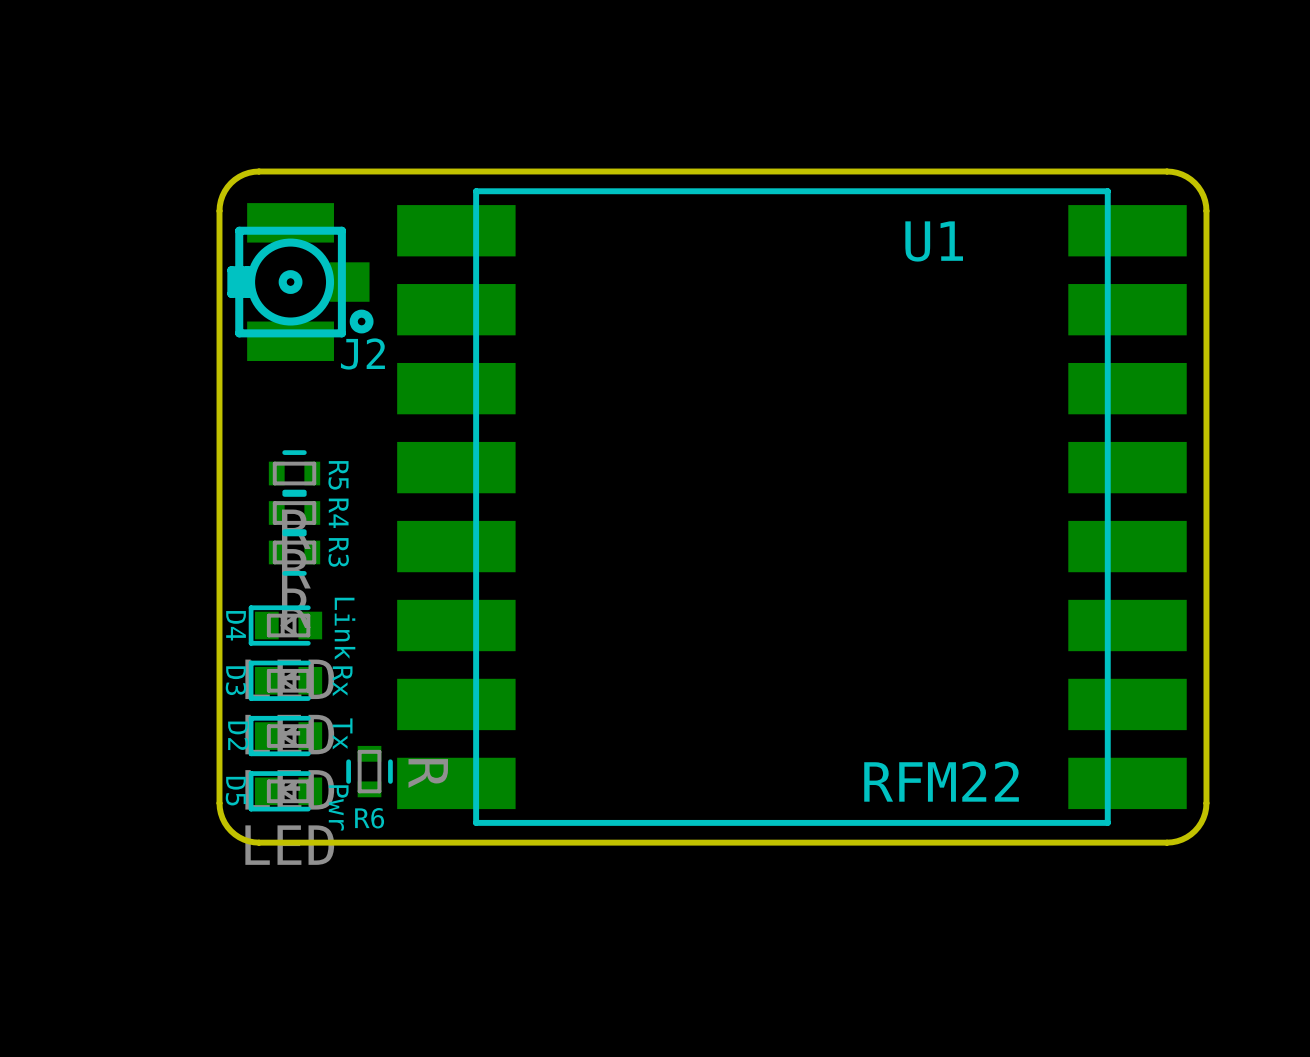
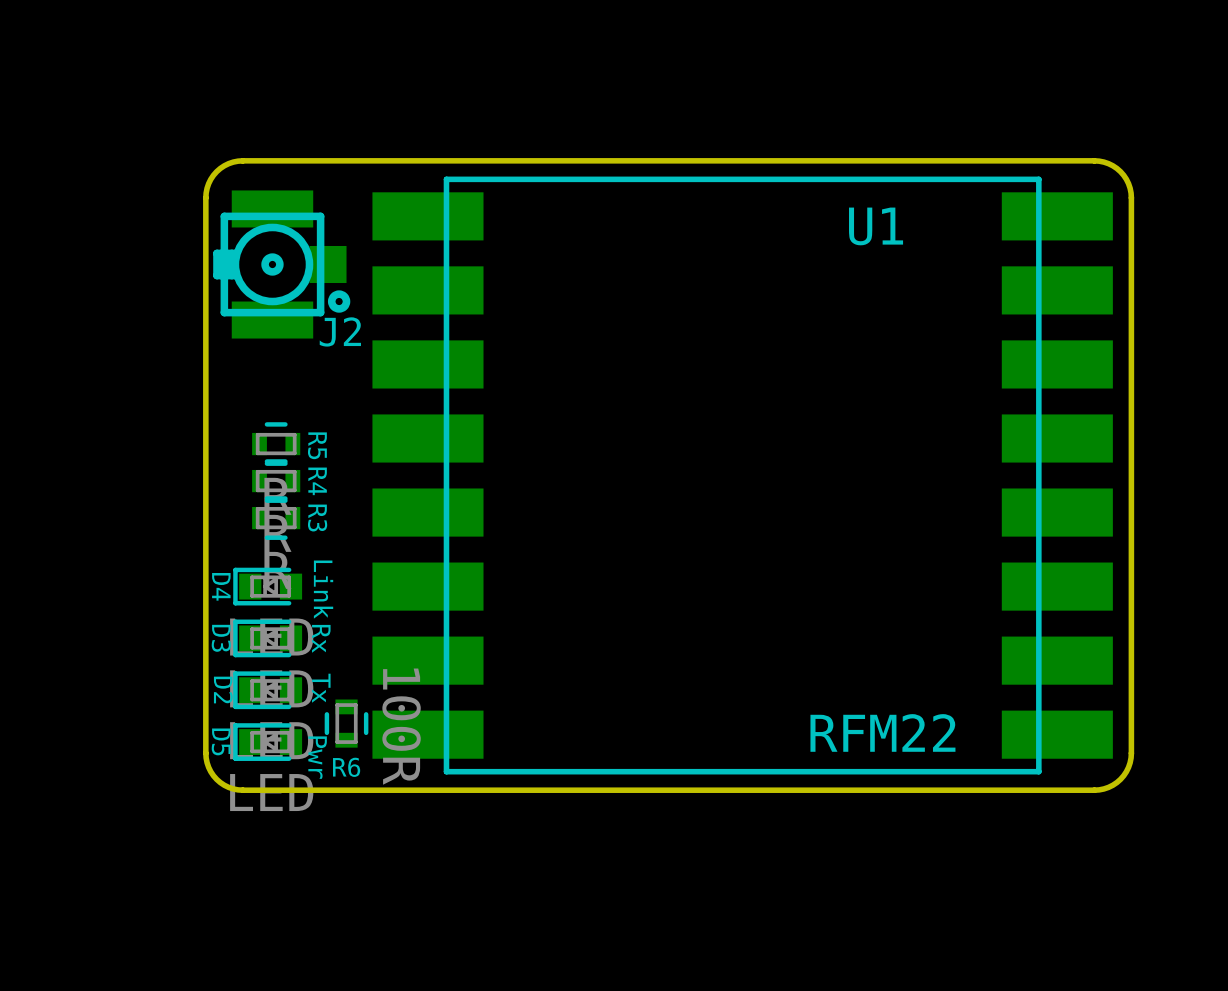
R6 value: R (428, 773) -> 100R (401, 726)

